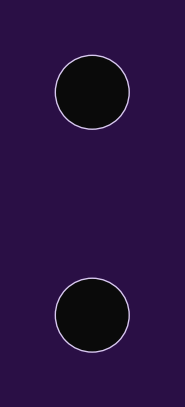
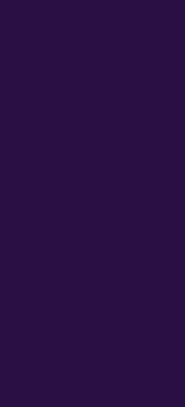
part: (92, 92) -> none
part: (92, 315) -> none

